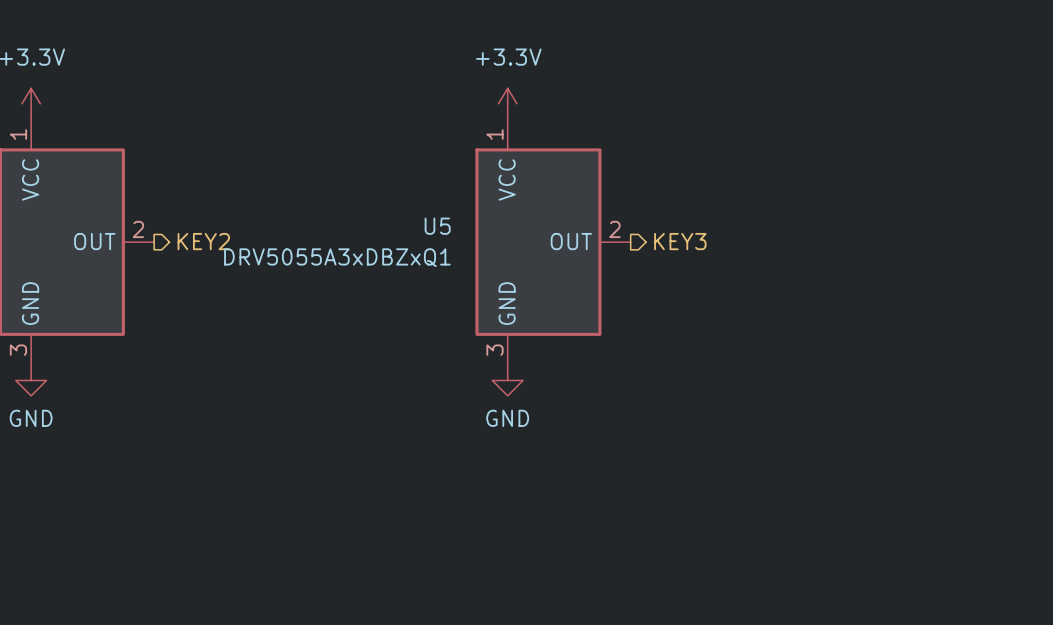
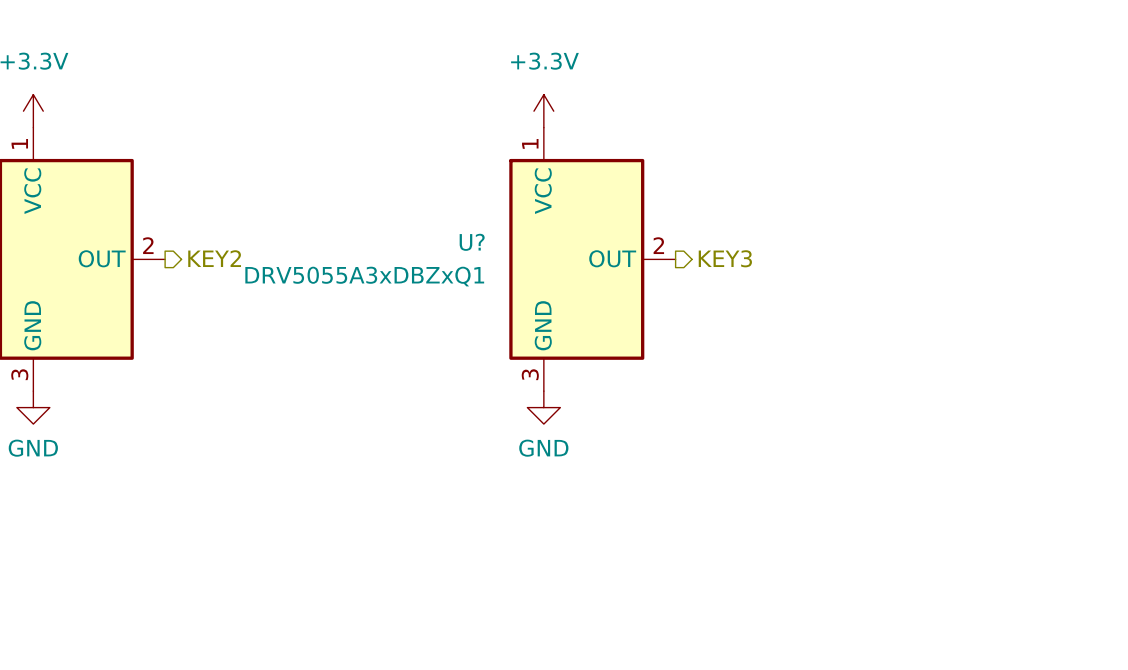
U5 name: U5 (437, 226) -> U? (472, 242)

